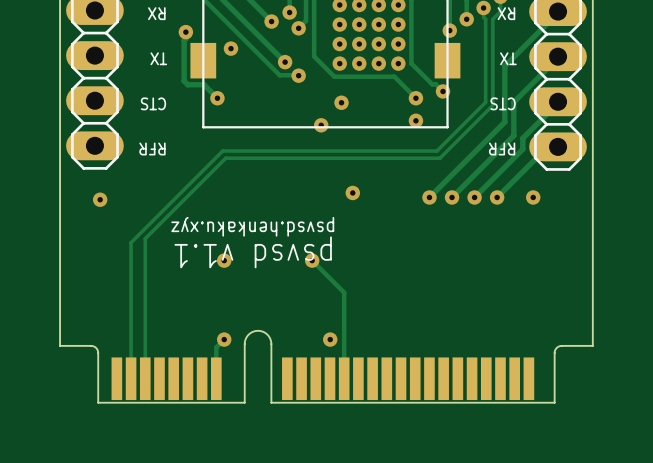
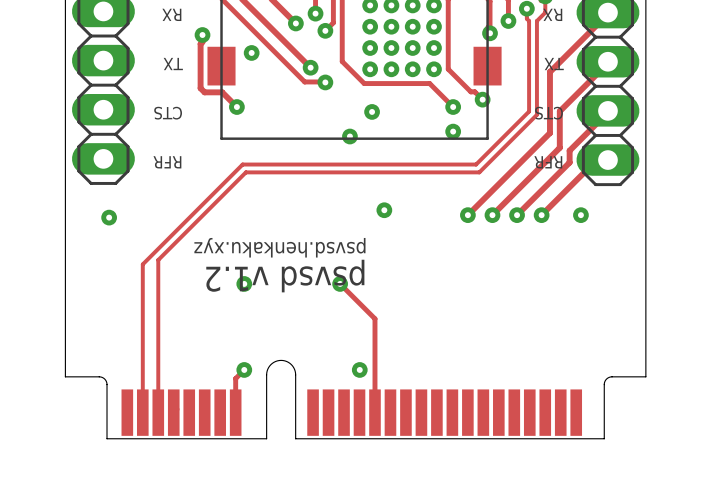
text: psvsd v1.1 (253, 252) -> psvsd v1.2 (285, 276)

